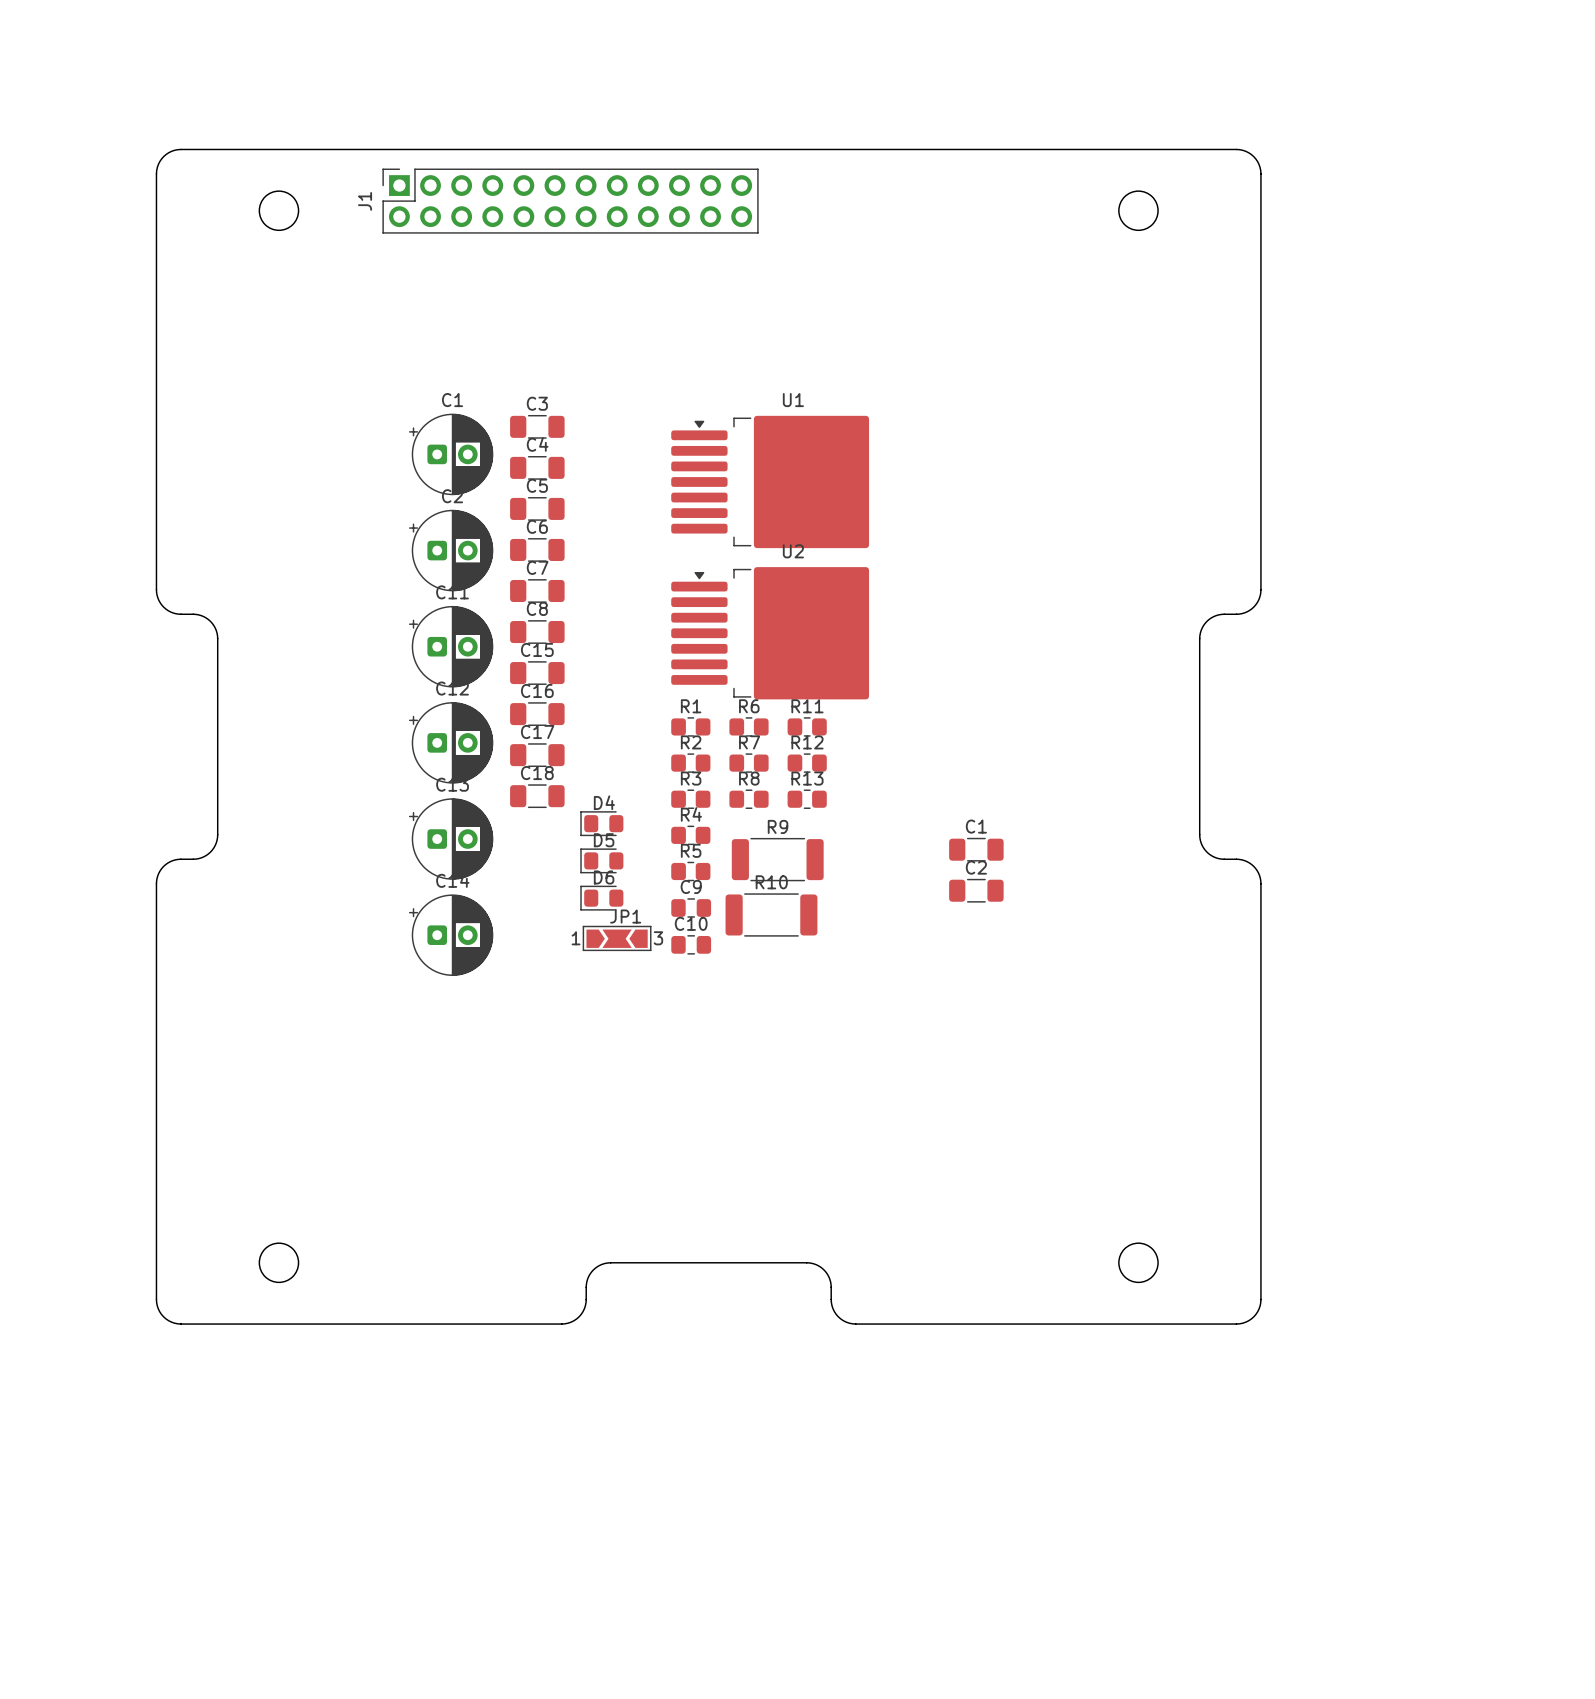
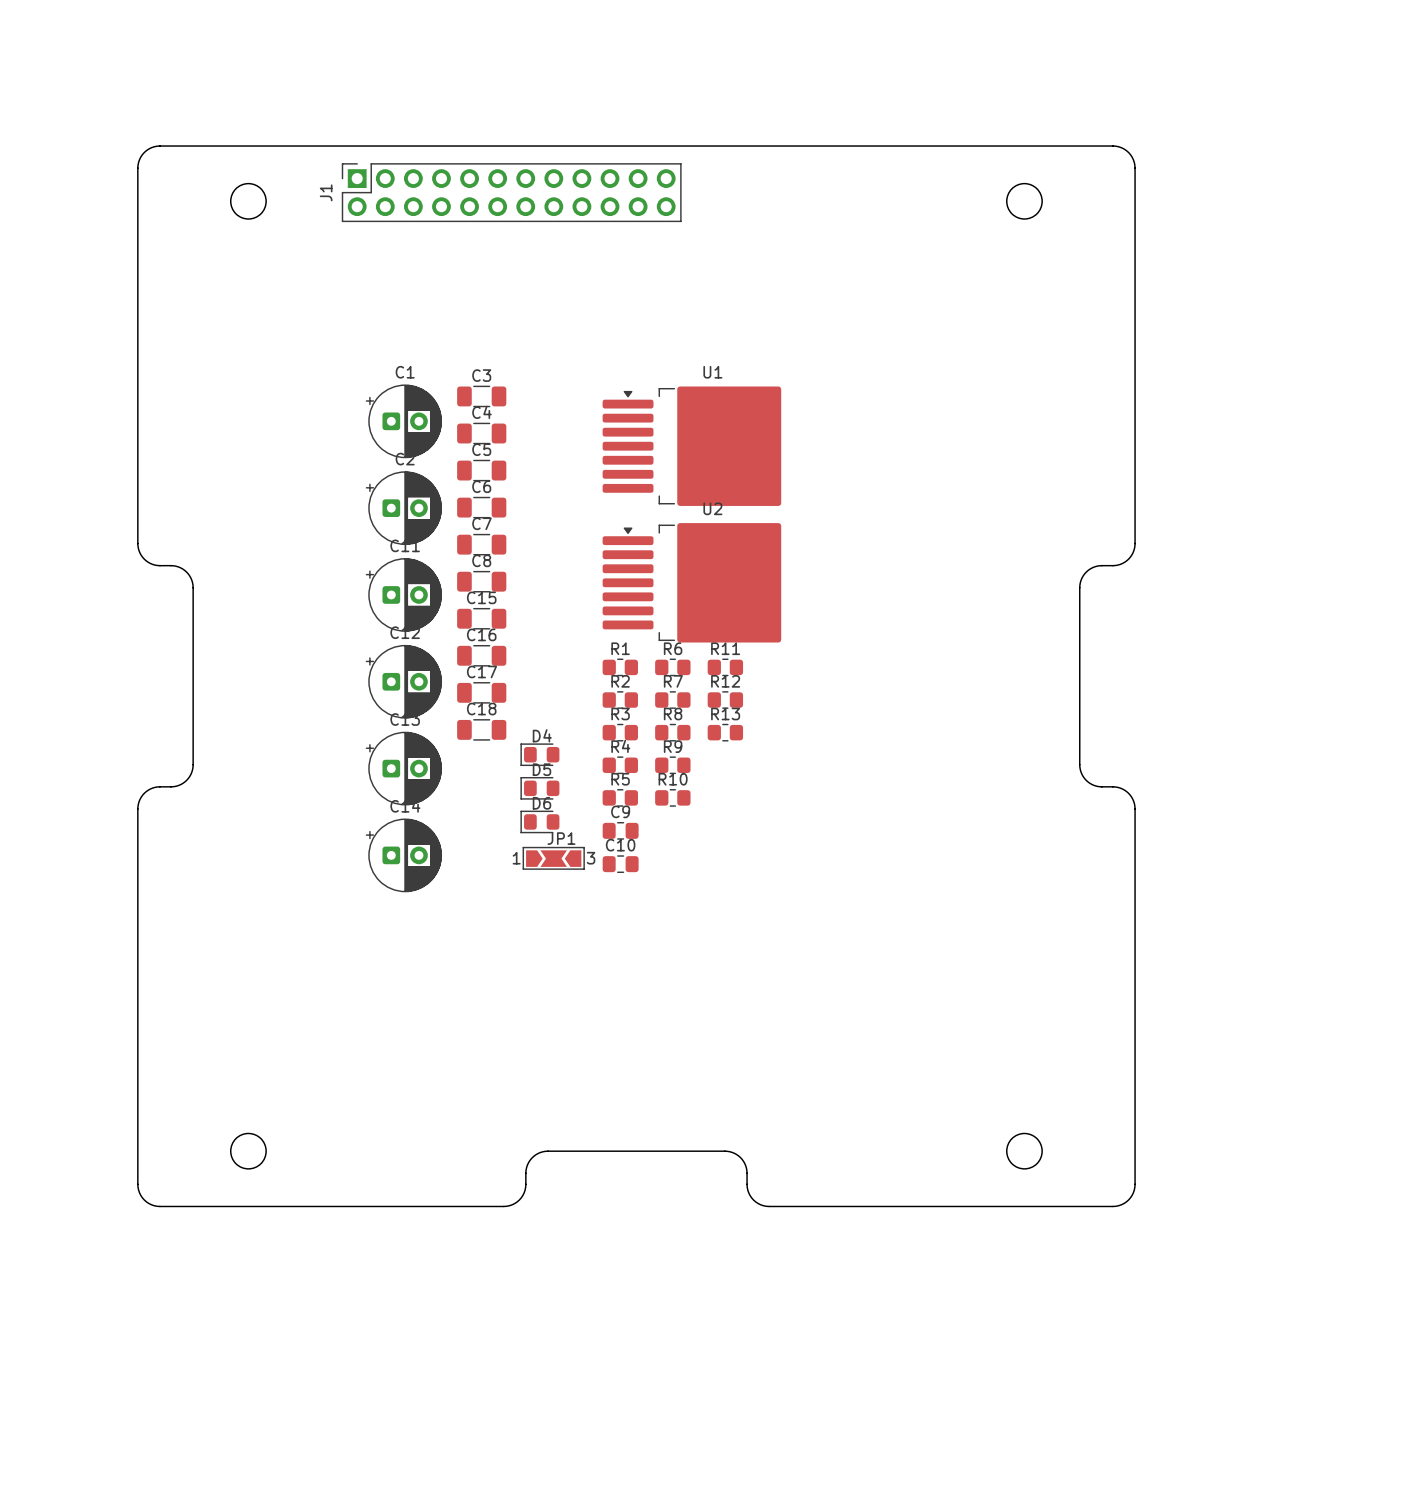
R9 footprint: [731, 837, 824, 882] -> [655, 756, 691, 775]
C1: (976, 849) -> none
C2: (976, 890) -> none
R10 footprint: [725, 893, 818, 937] -> [655, 789, 691, 807]

